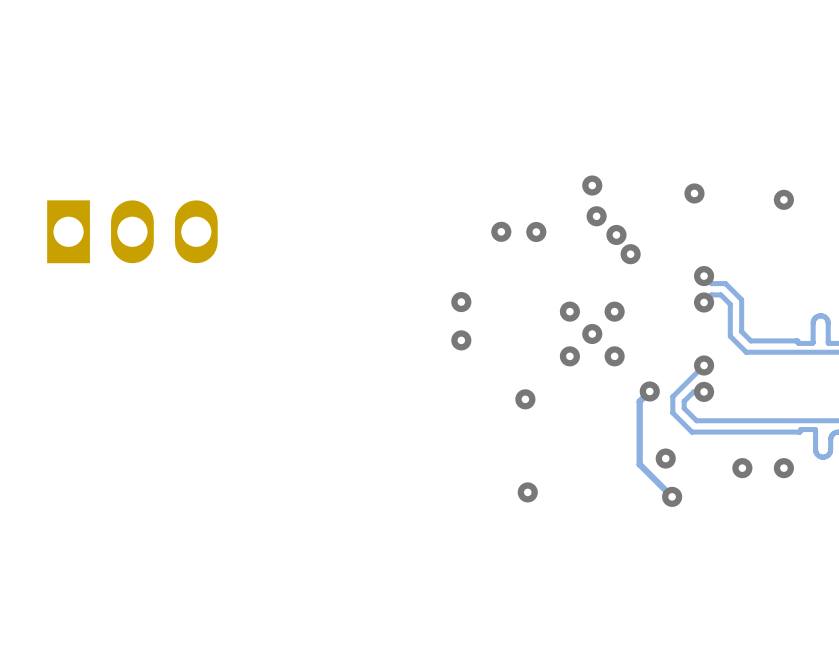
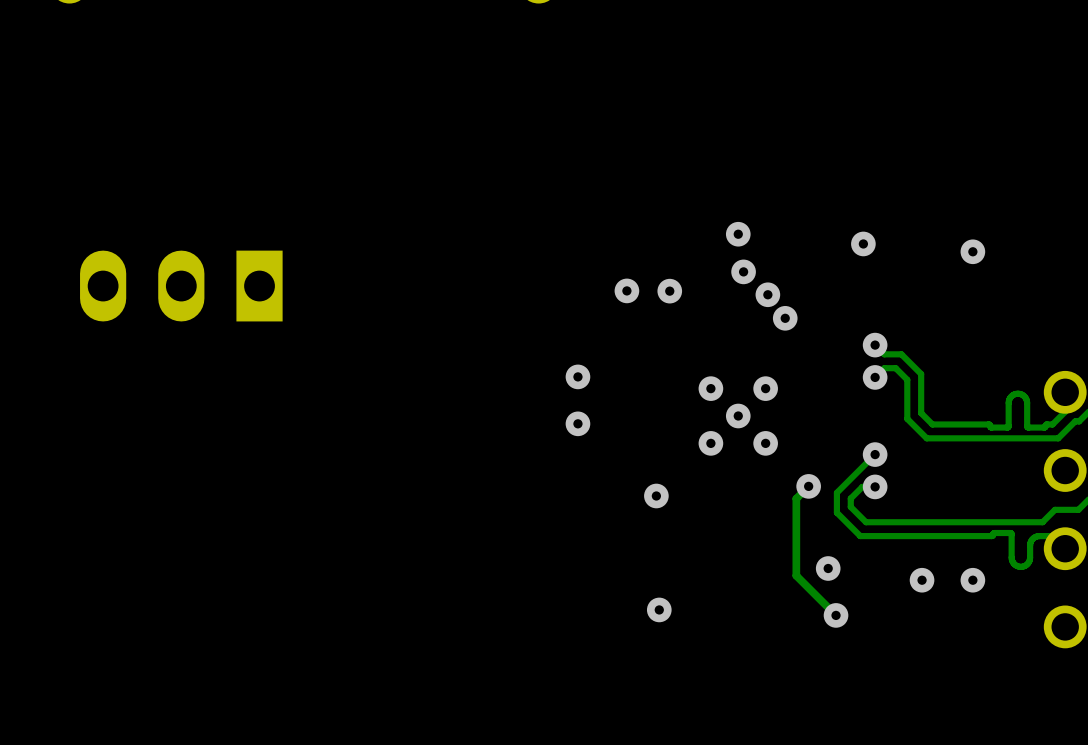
part footprint: [47, 200, 218, 264] -> [80, 250, 283, 322]

